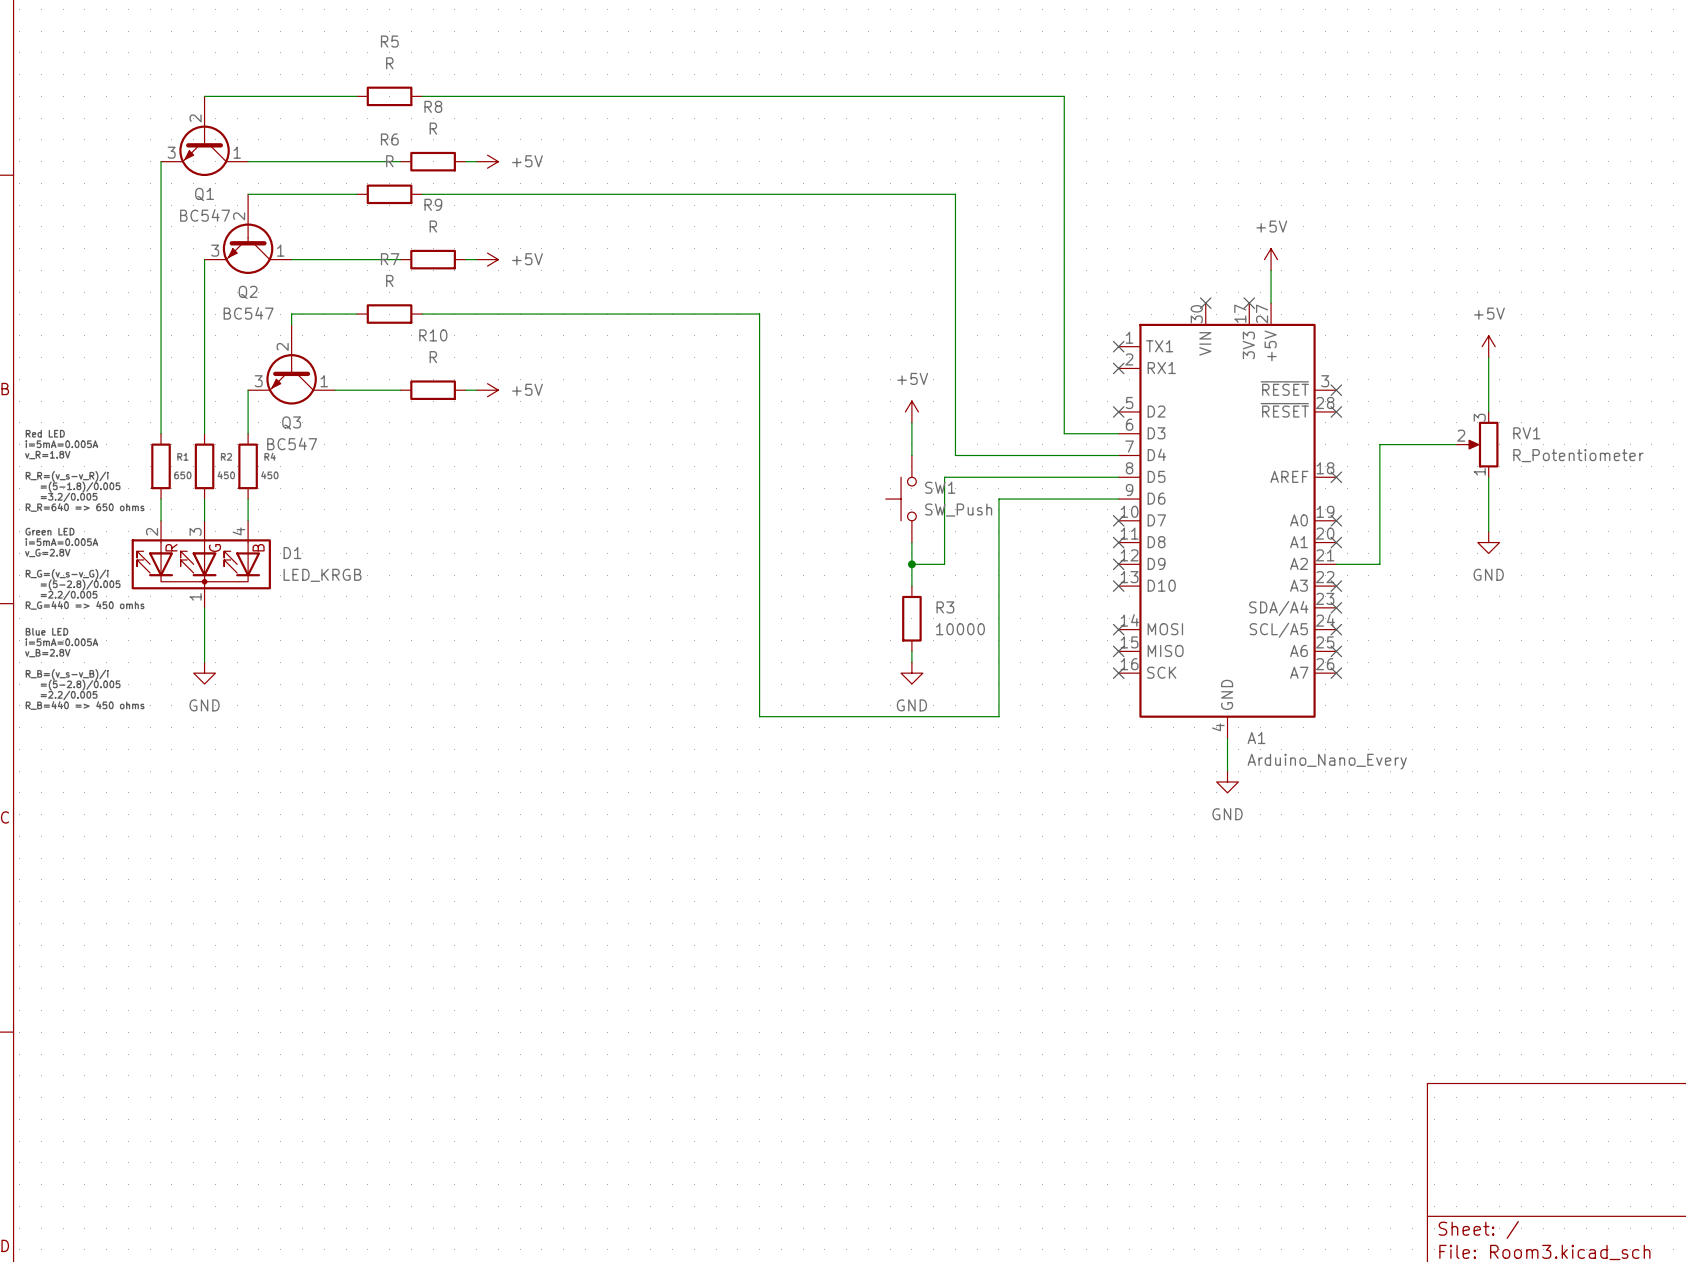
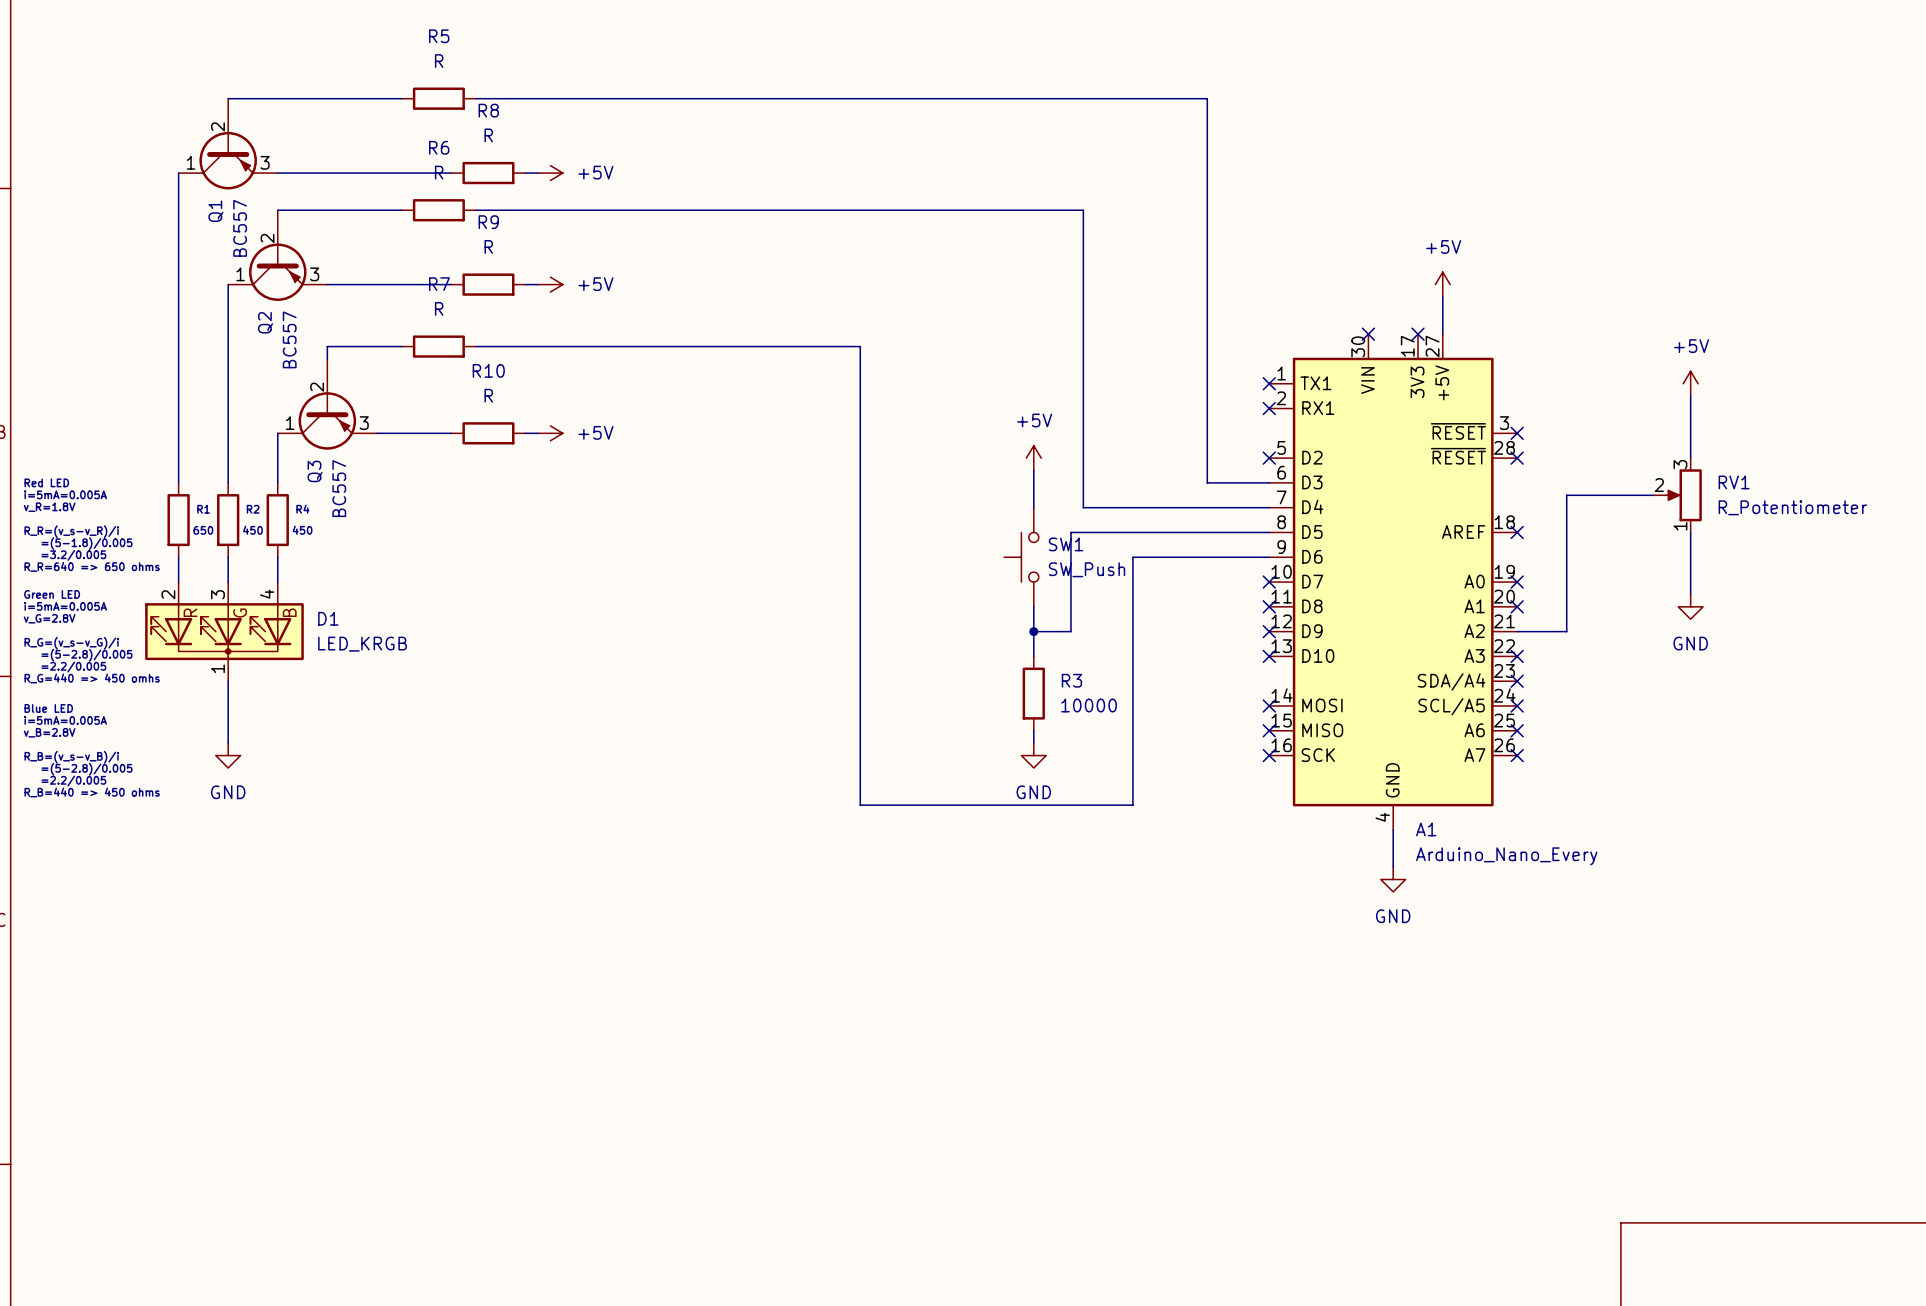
Q1 symbol: [161, 96, 249, 177] -> [178, 98, 278, 190]
Q2 symbol: [204, 194, 292, 274] -> [228, 210, 328, 301]
Q1 value: BC547 (205, 215) -> BC557 (240, 228)
Q2 value: BC547 (248, 313) -> BC557 (289, 339)
Q3 symbol: [248, 324, 336, 405] -> [277, 358, 377, 450]
Q3 value: BC547 (292, 443) -> BC557 (339, 488)

